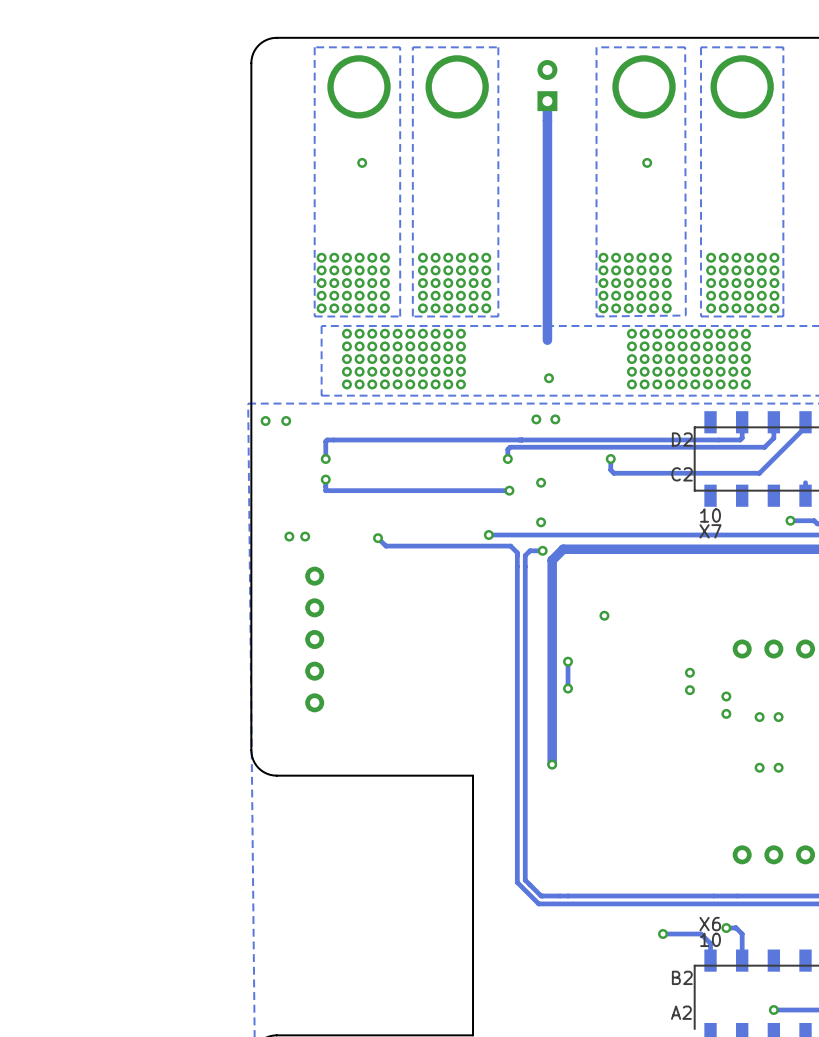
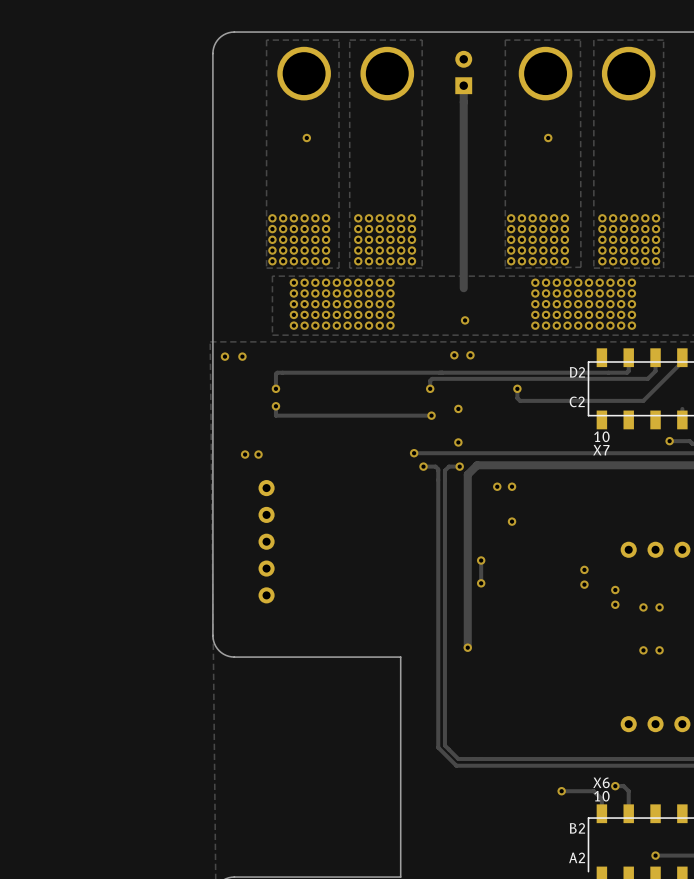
track: (378, 538) (385, 546) (510, 546) (517, 553) -> (423, 466) (435, 466) (438, 469)
via: (378, 538) -> none
via: none -> (423, 466)
via: none -> (497, 486)
via: none -> (512, 486)

